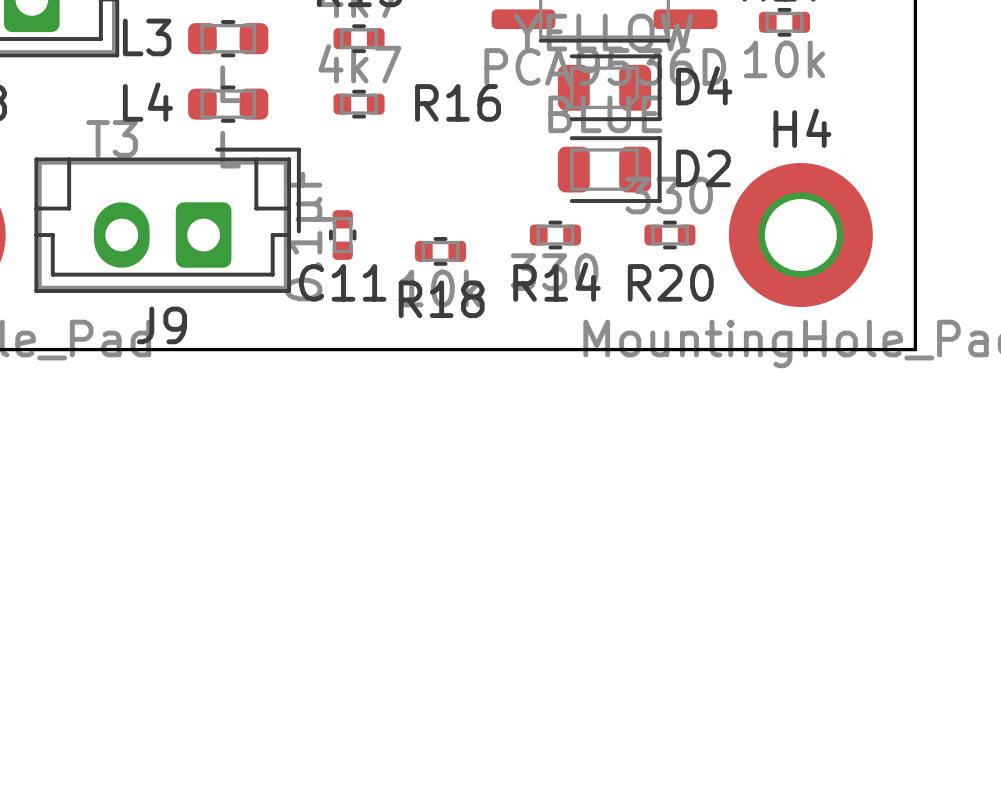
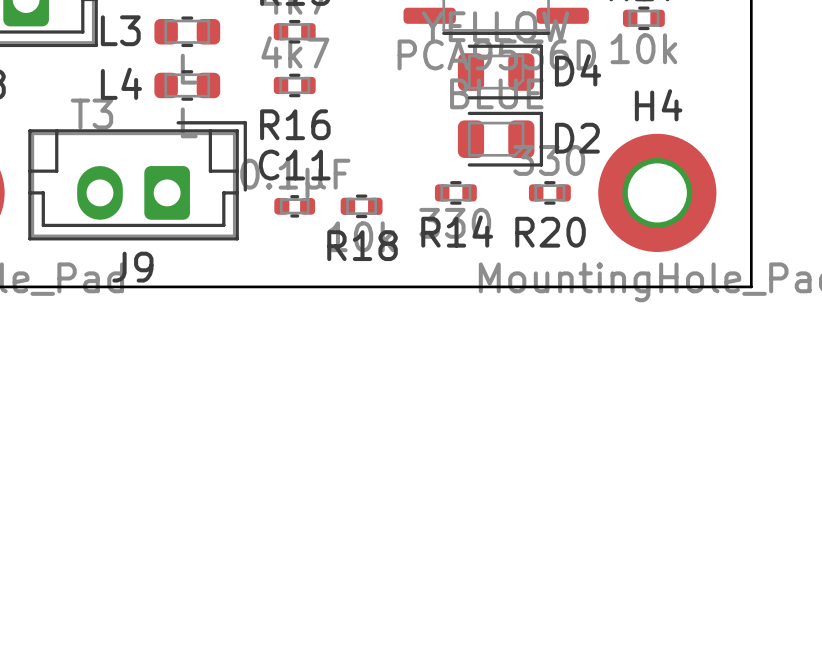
R16 name position: R16 (458, 102) -> R16 (295, 124)
C11 rotation: 0° (342, 235) -> 90° clockwise (294, 206)
C11 name position: C11 (342, 282) -> C11 (294, 165)

